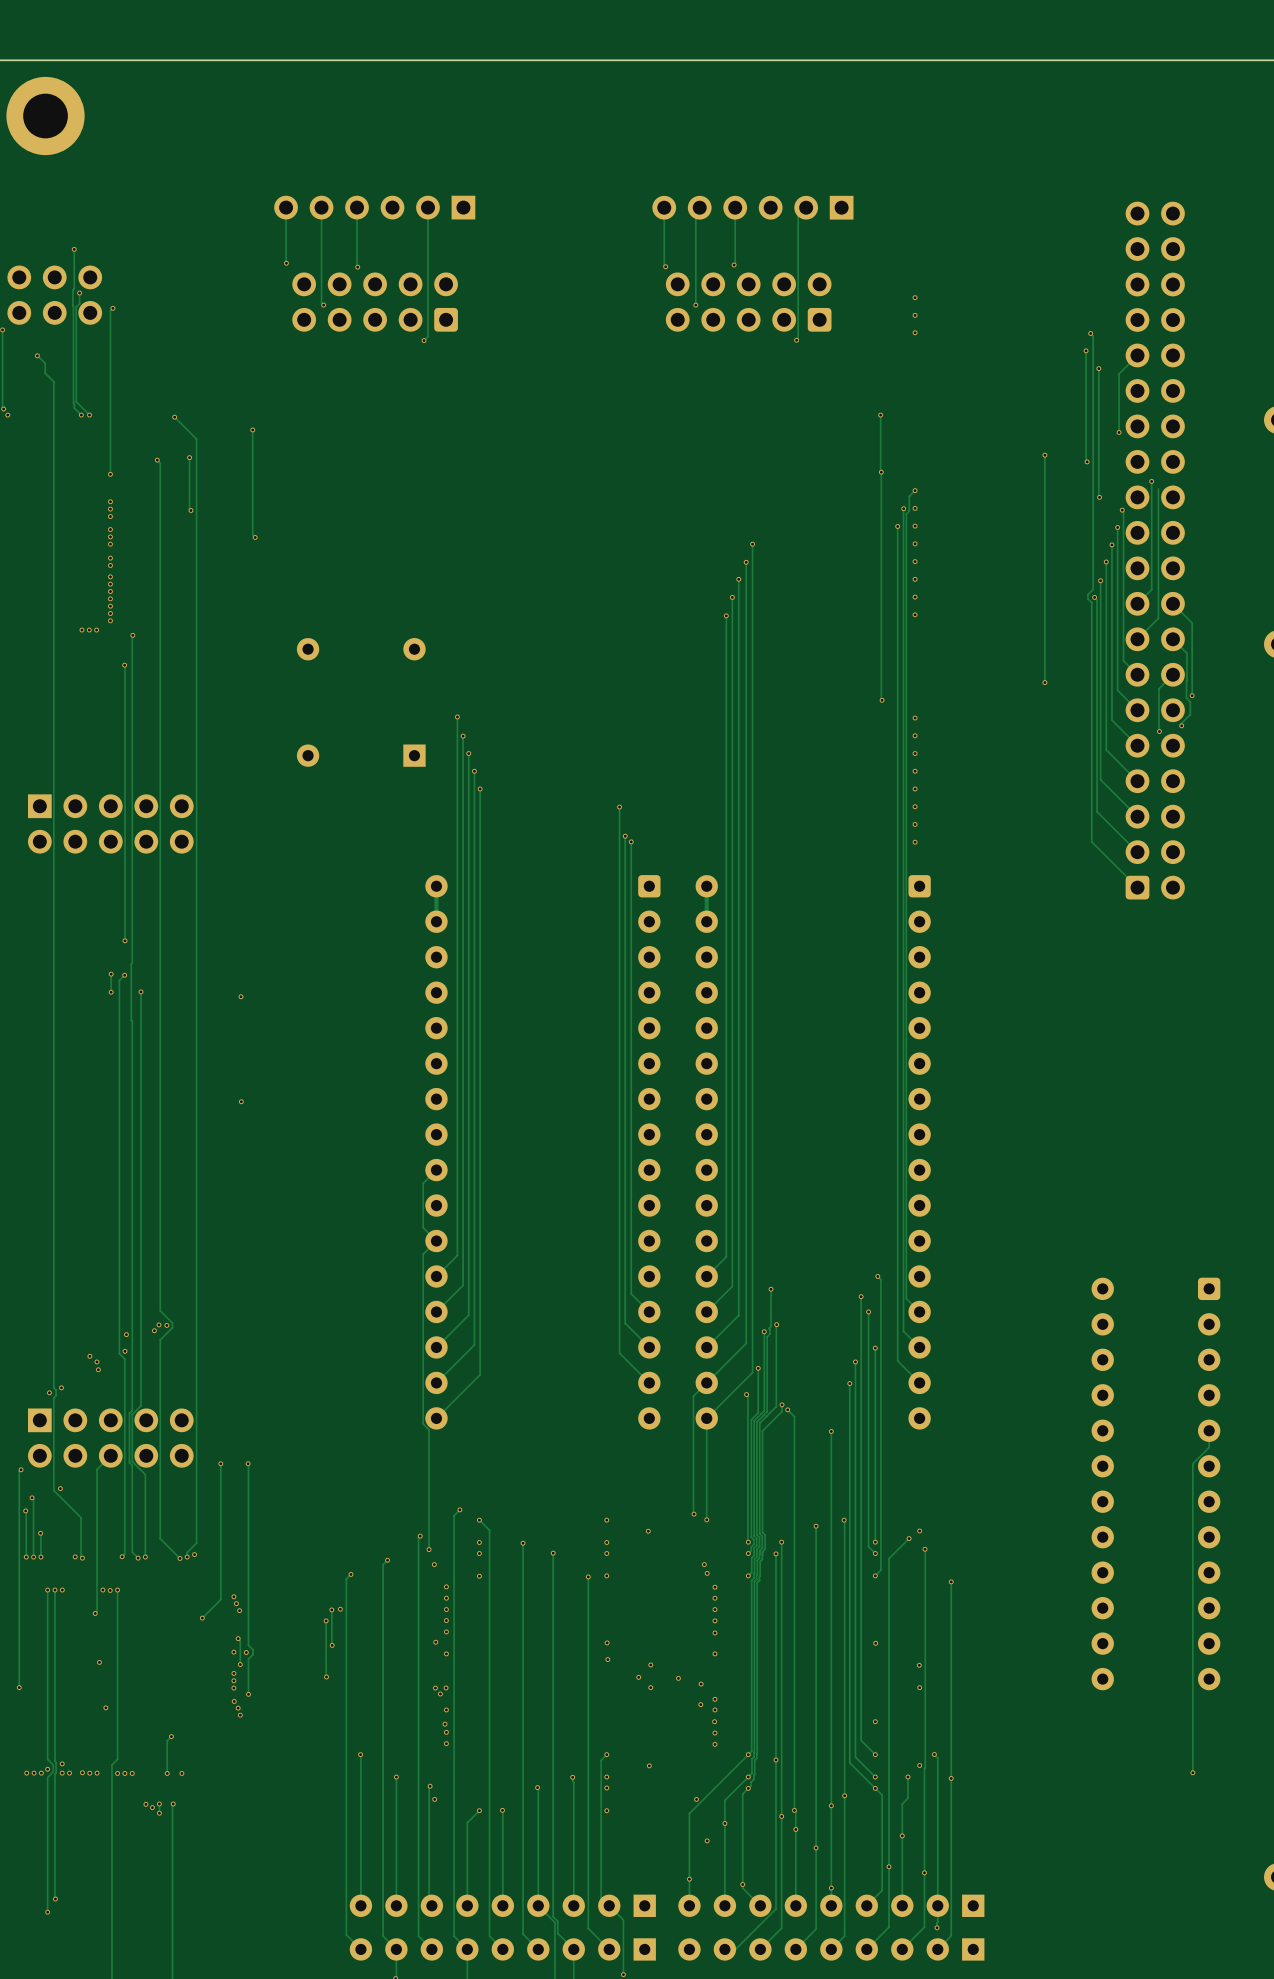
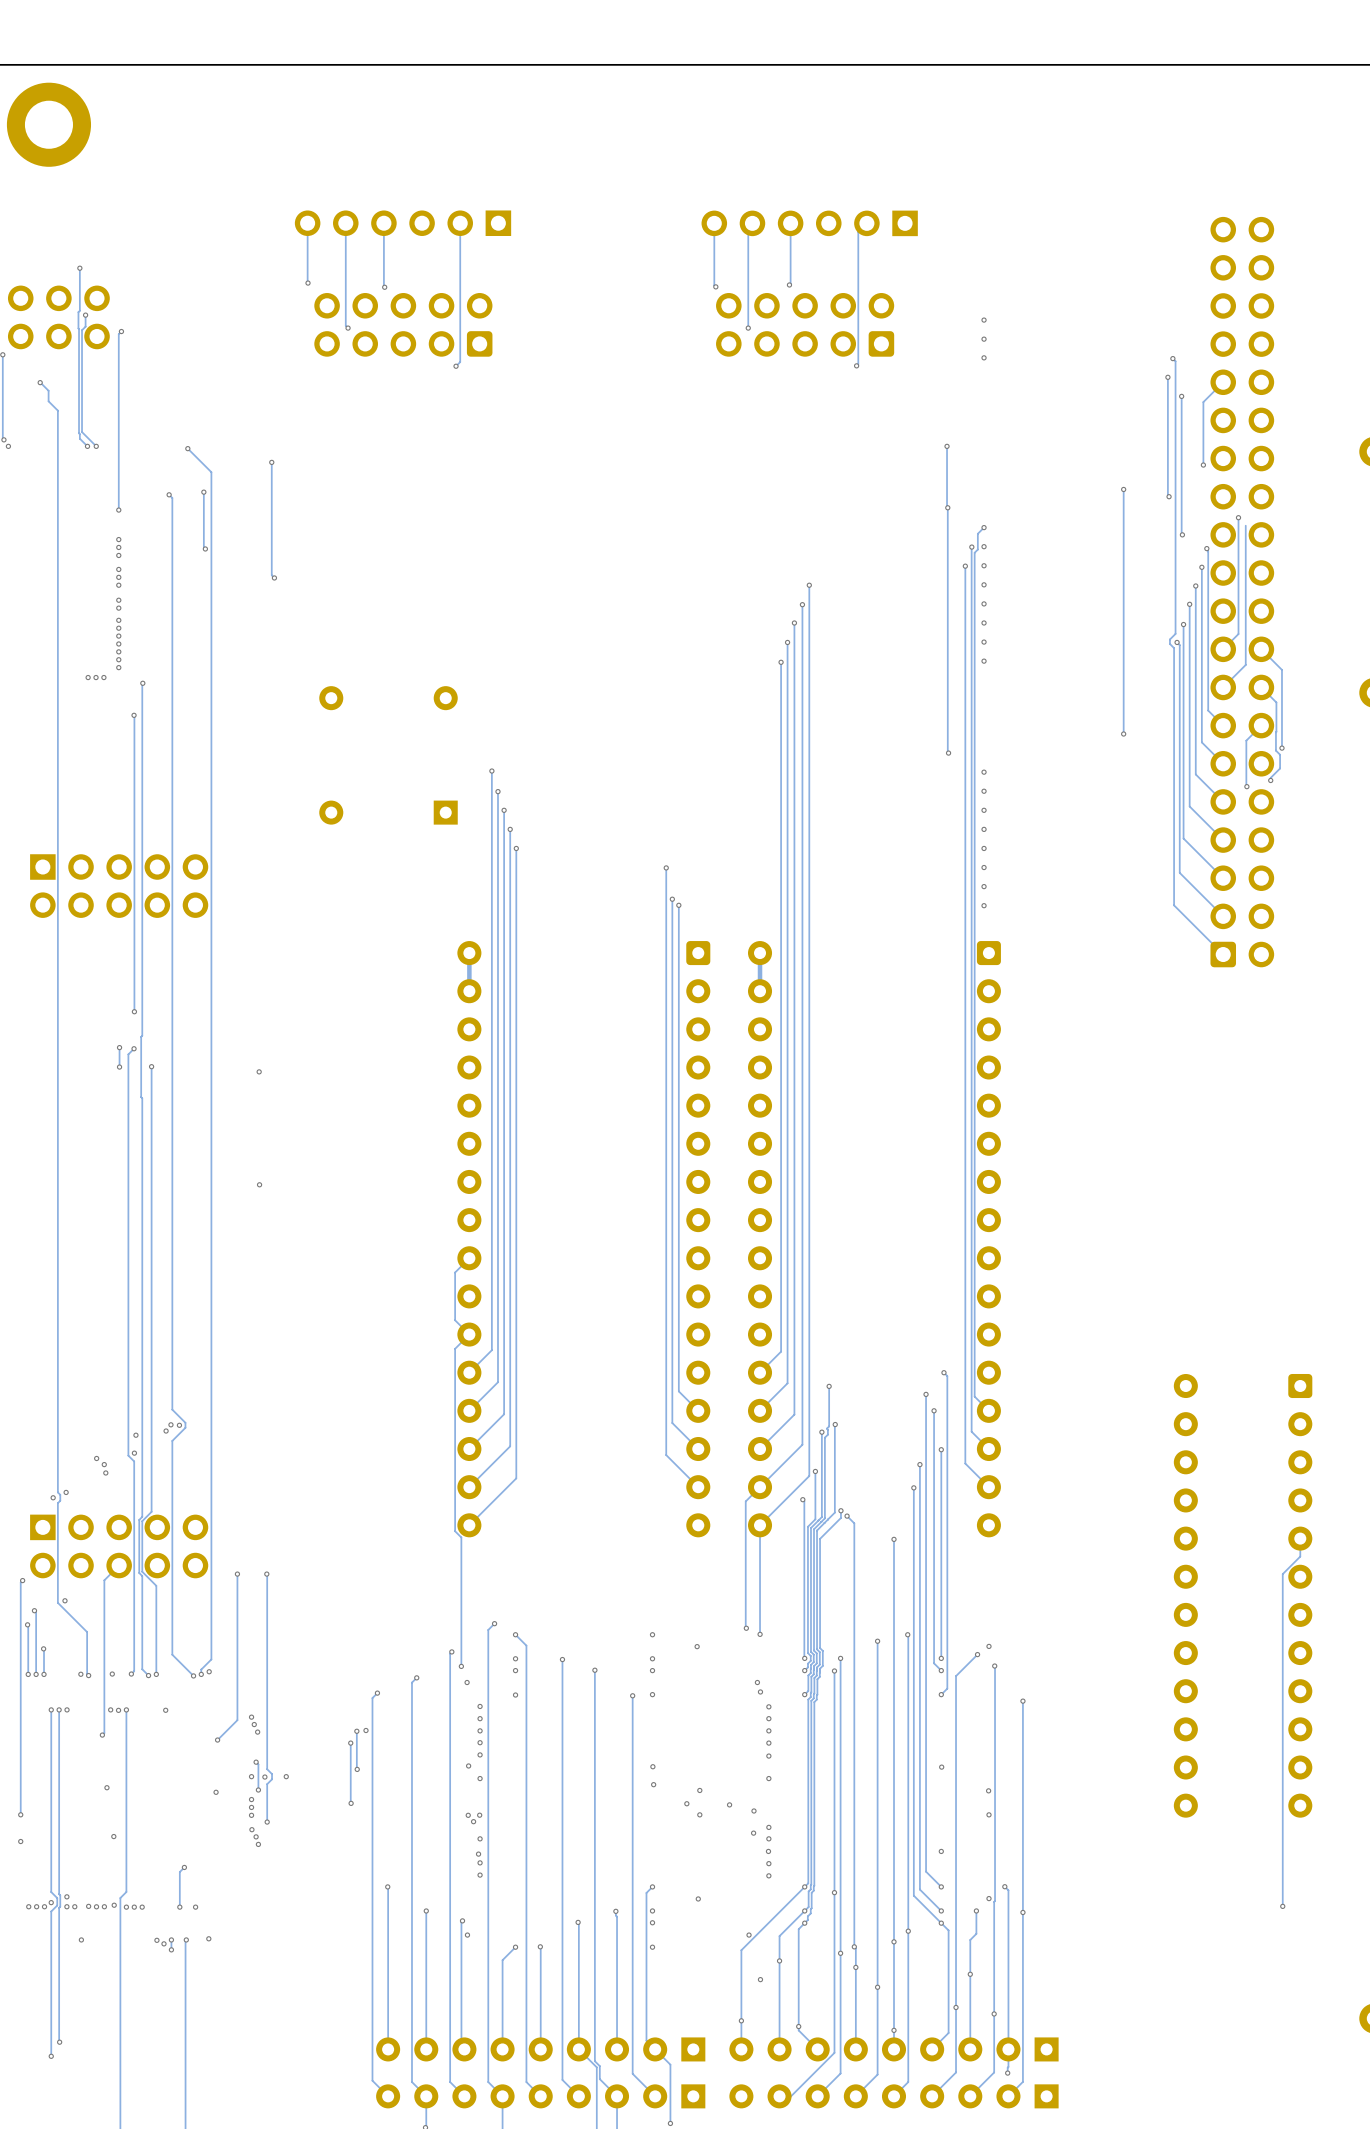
via: none -> (112, 1674)
via: none -> (165, 1710)
via: none -> (286, 1776)
via: none -> (216, 1792)
via: none -> (20, 1841)
via: none -> (114, 1905)
via: none -> (208, 1938)
via: none -> (81, 1939)

